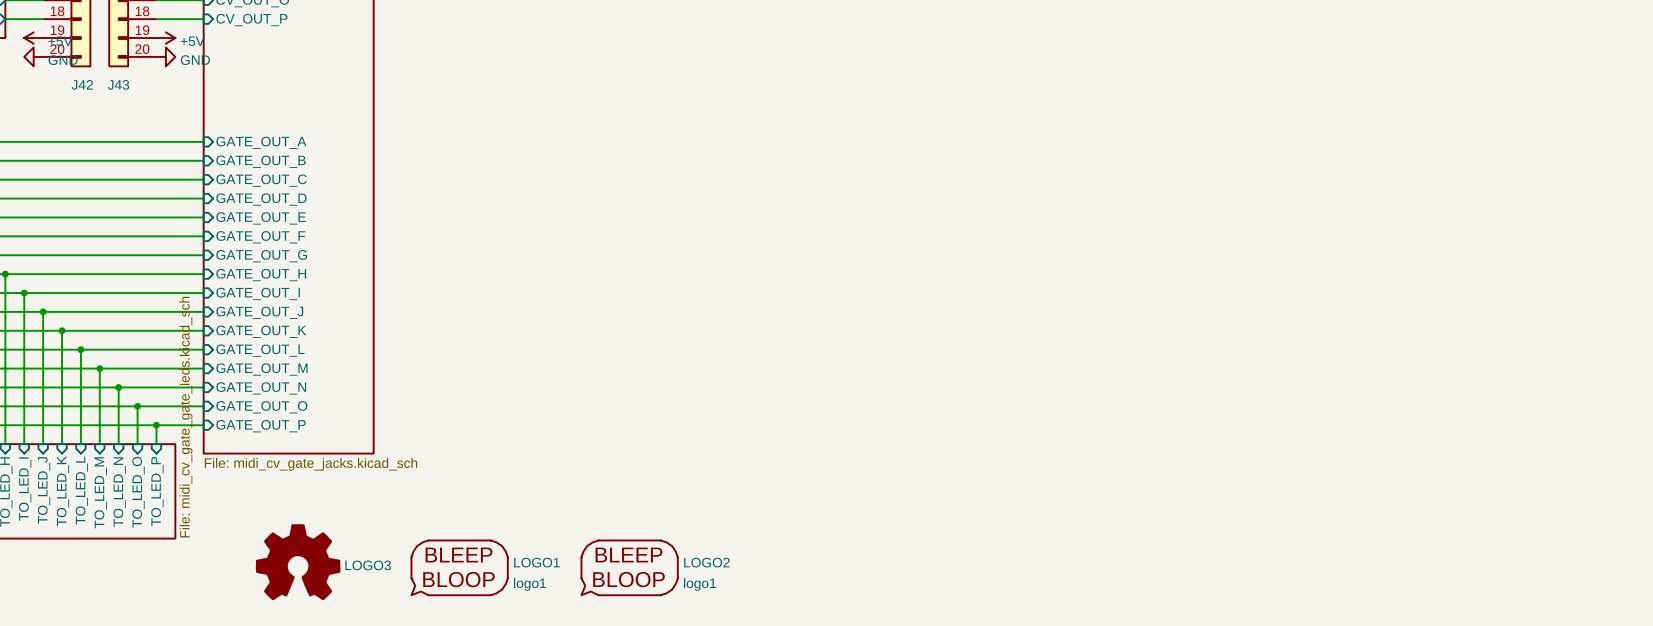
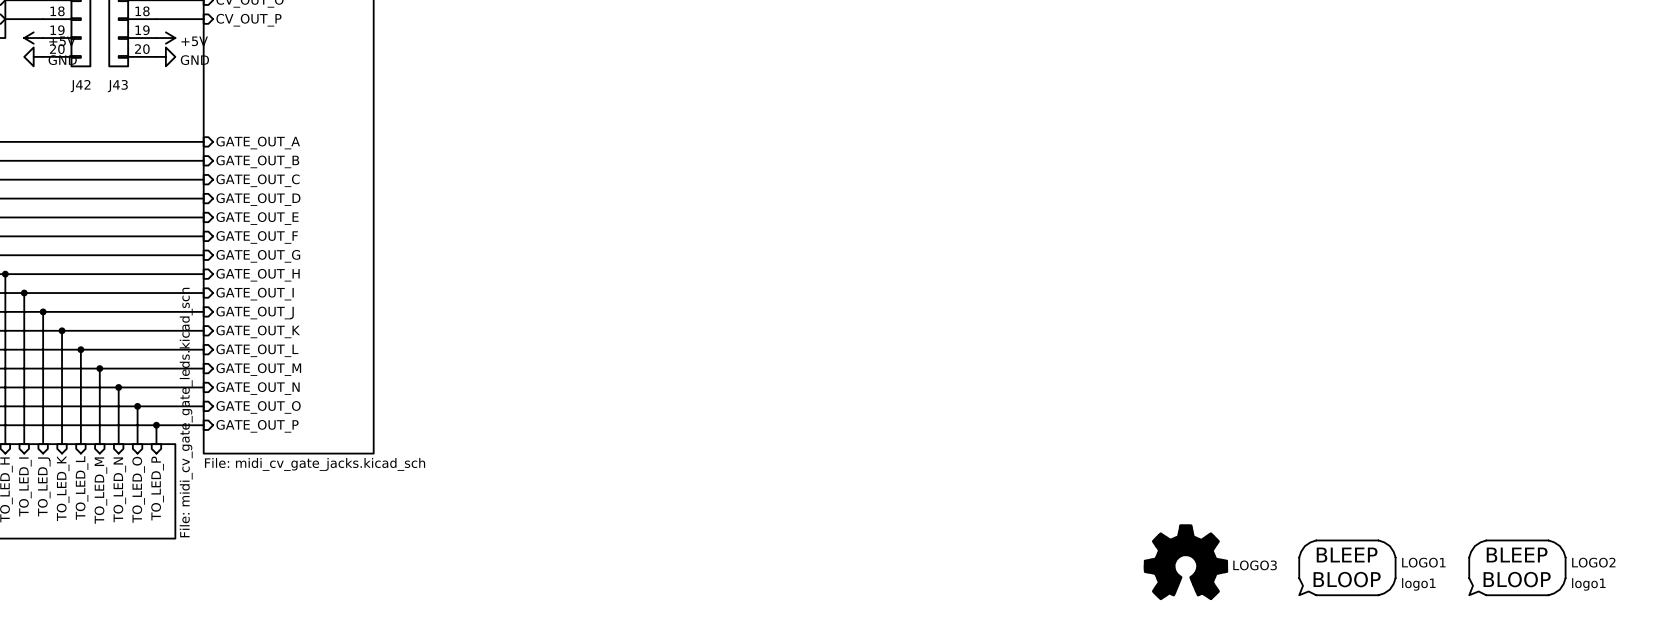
LOGO3 position: (298, 562) -> (1185, 562)
LOGO1 position: (459, 569) -> (1347, 569)
LOGO2 position: (629, 569) -> (1517, 569)

